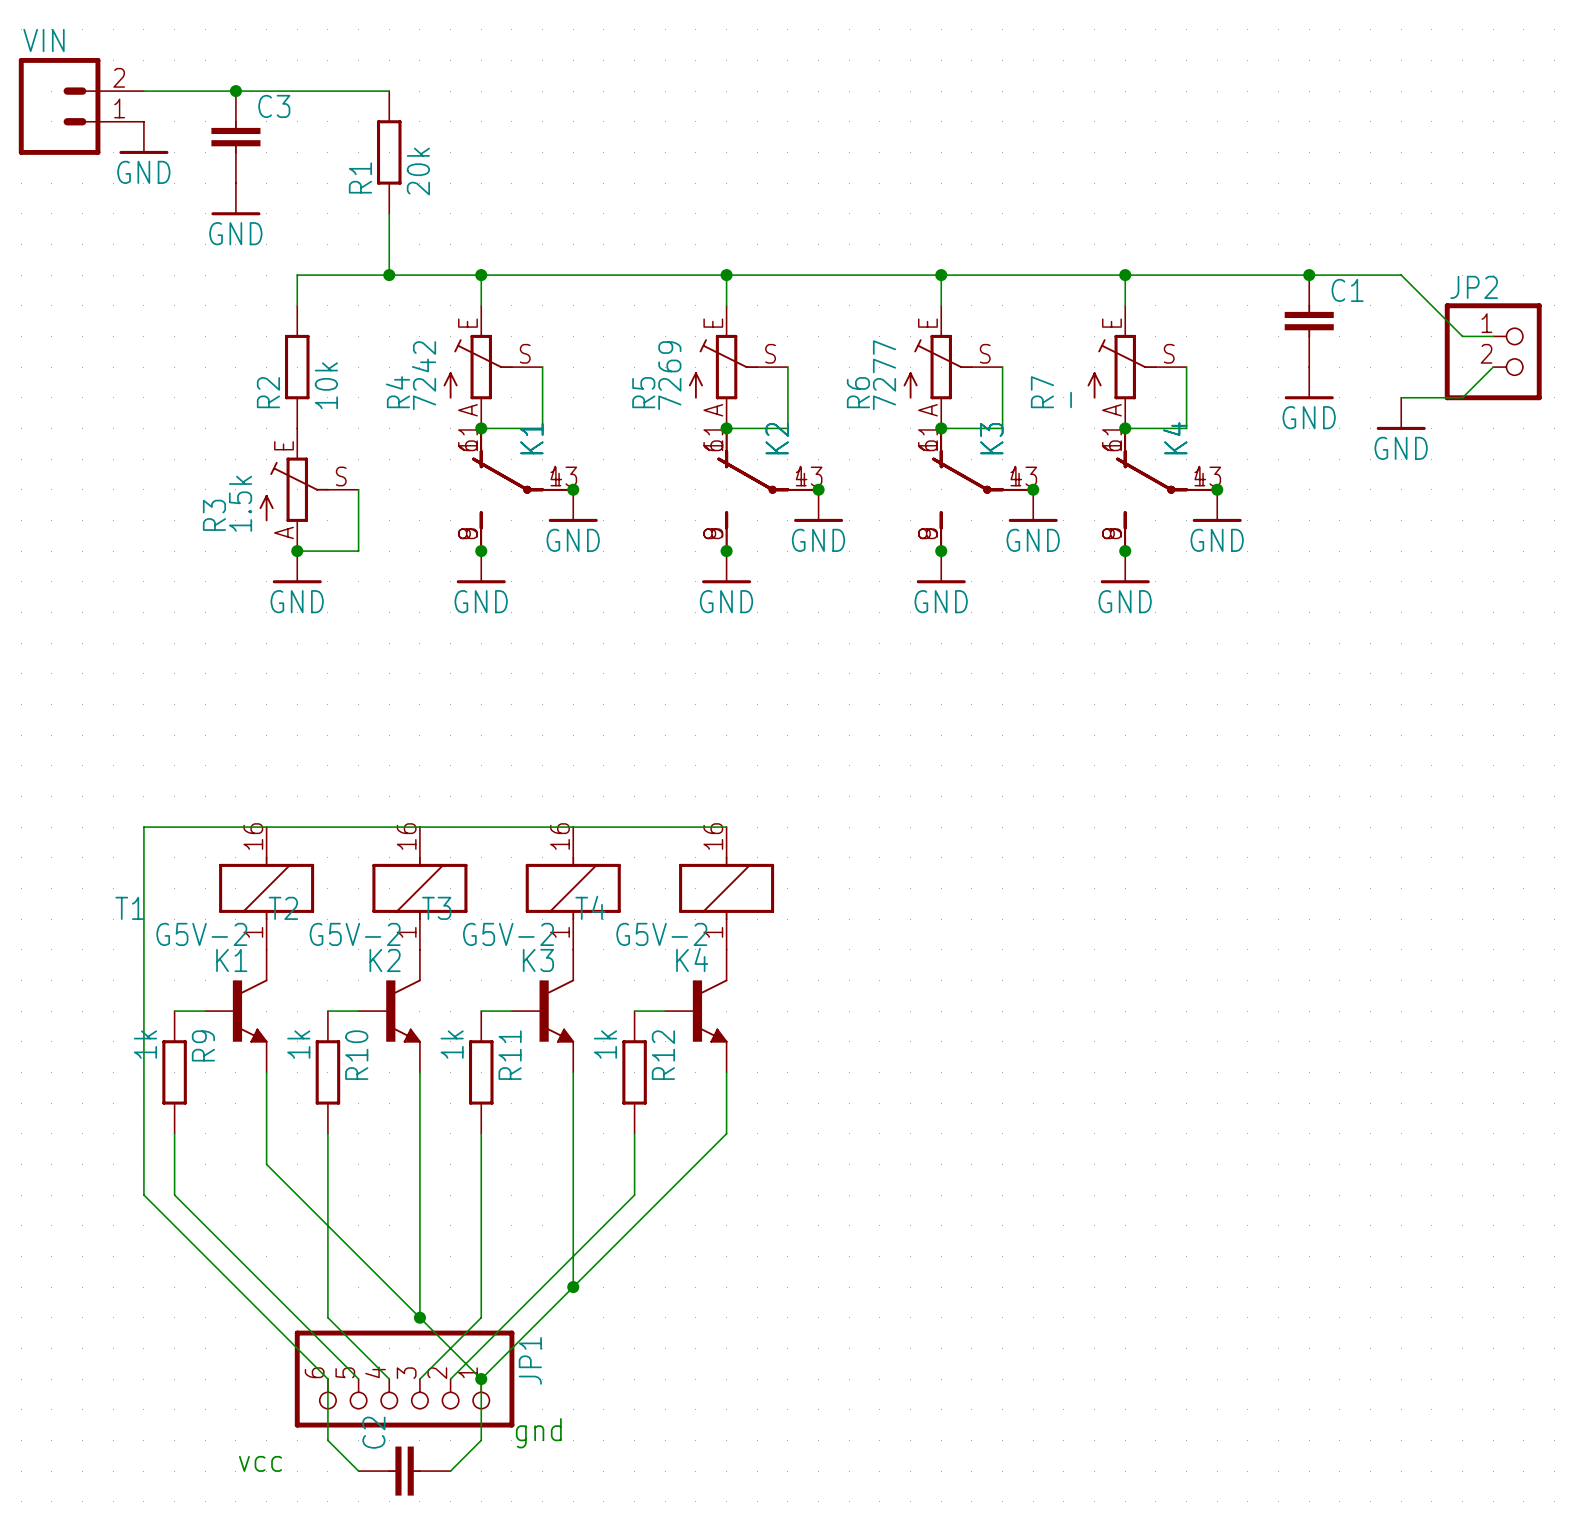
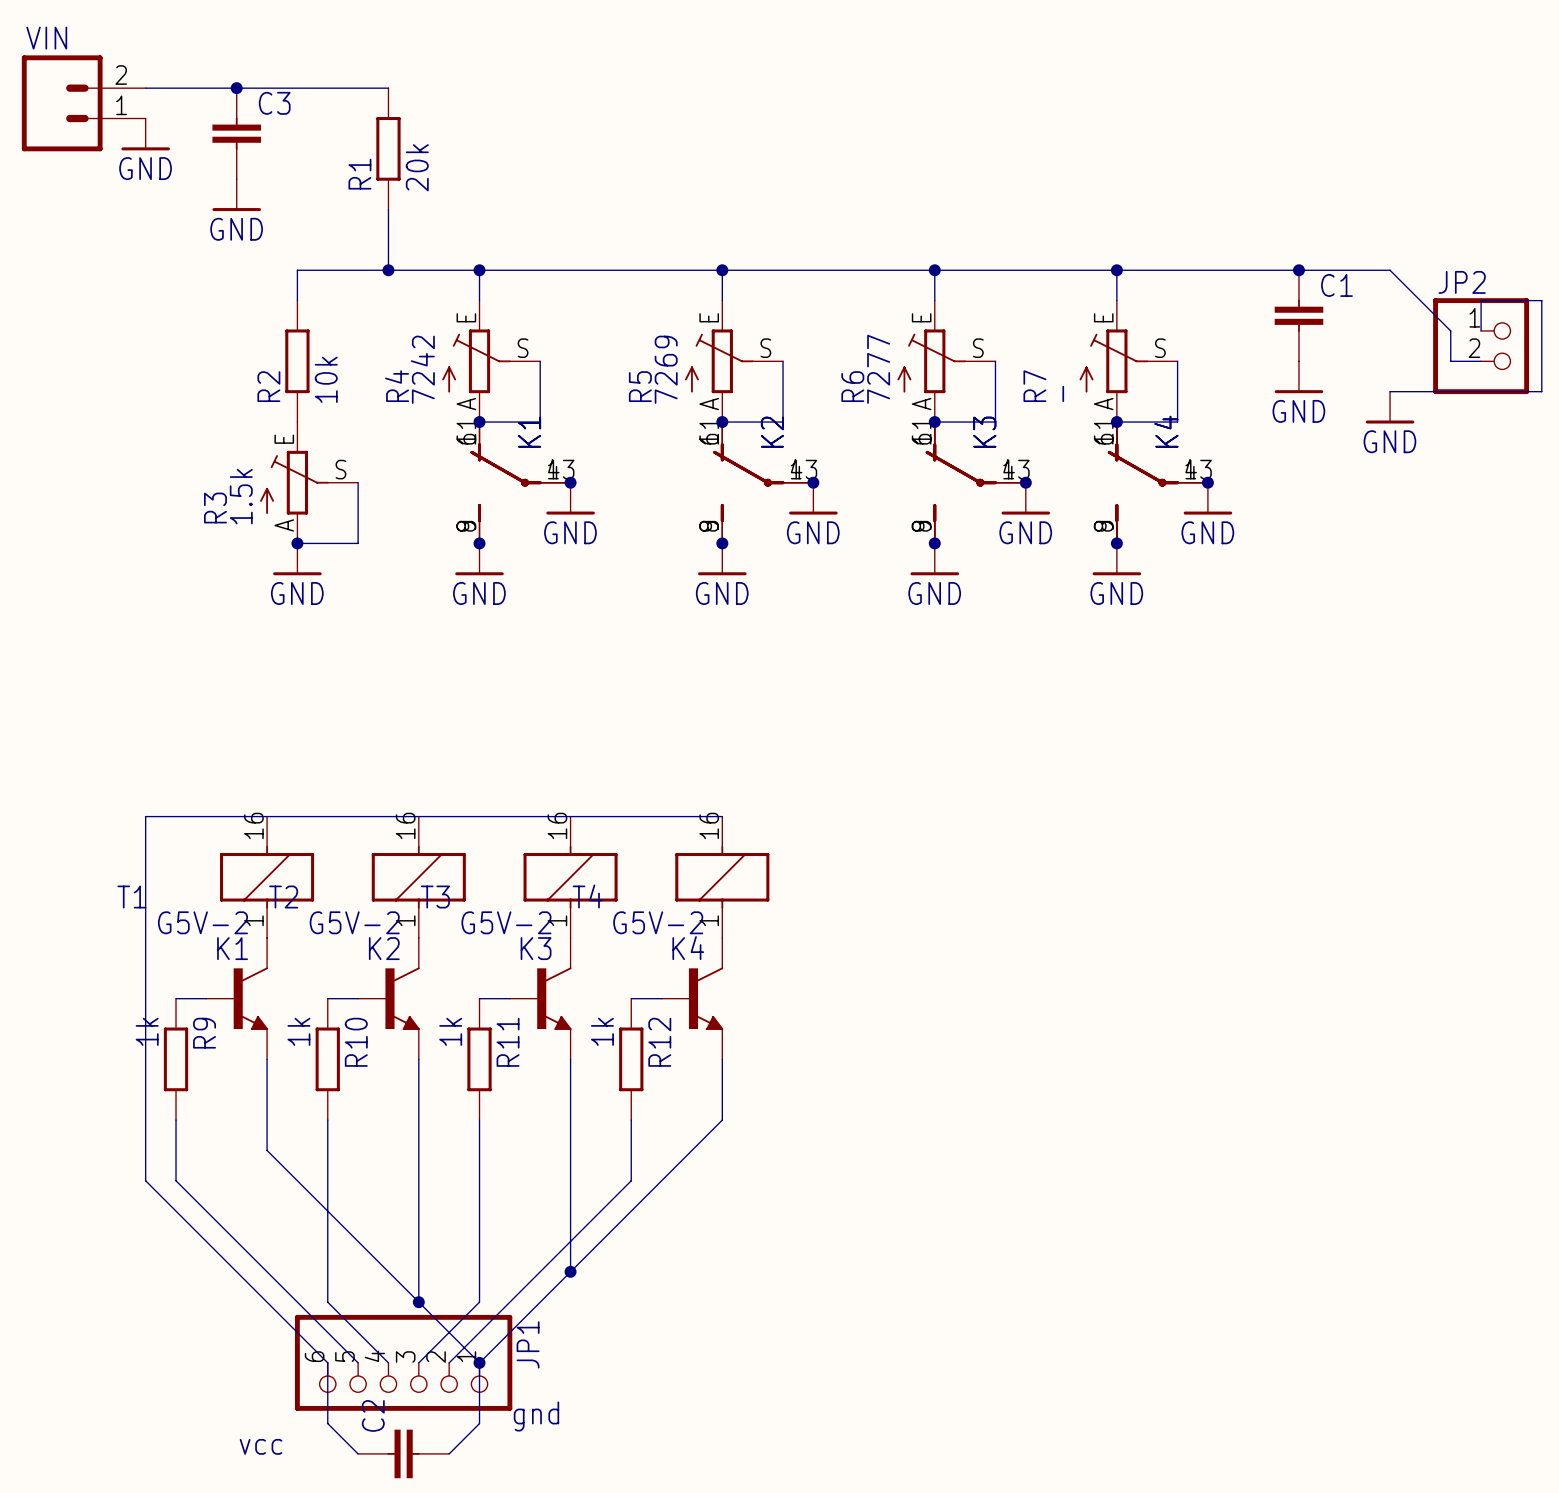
wire: (1462, 336) (1493, 336) -> (1450, 330) (1450, 361) (1481, 361)
wire: (1493, 367) (1462, 397) -> (1481, 330) (1481, 300) (1541, 300) (1541, 391) (1450, 391)

